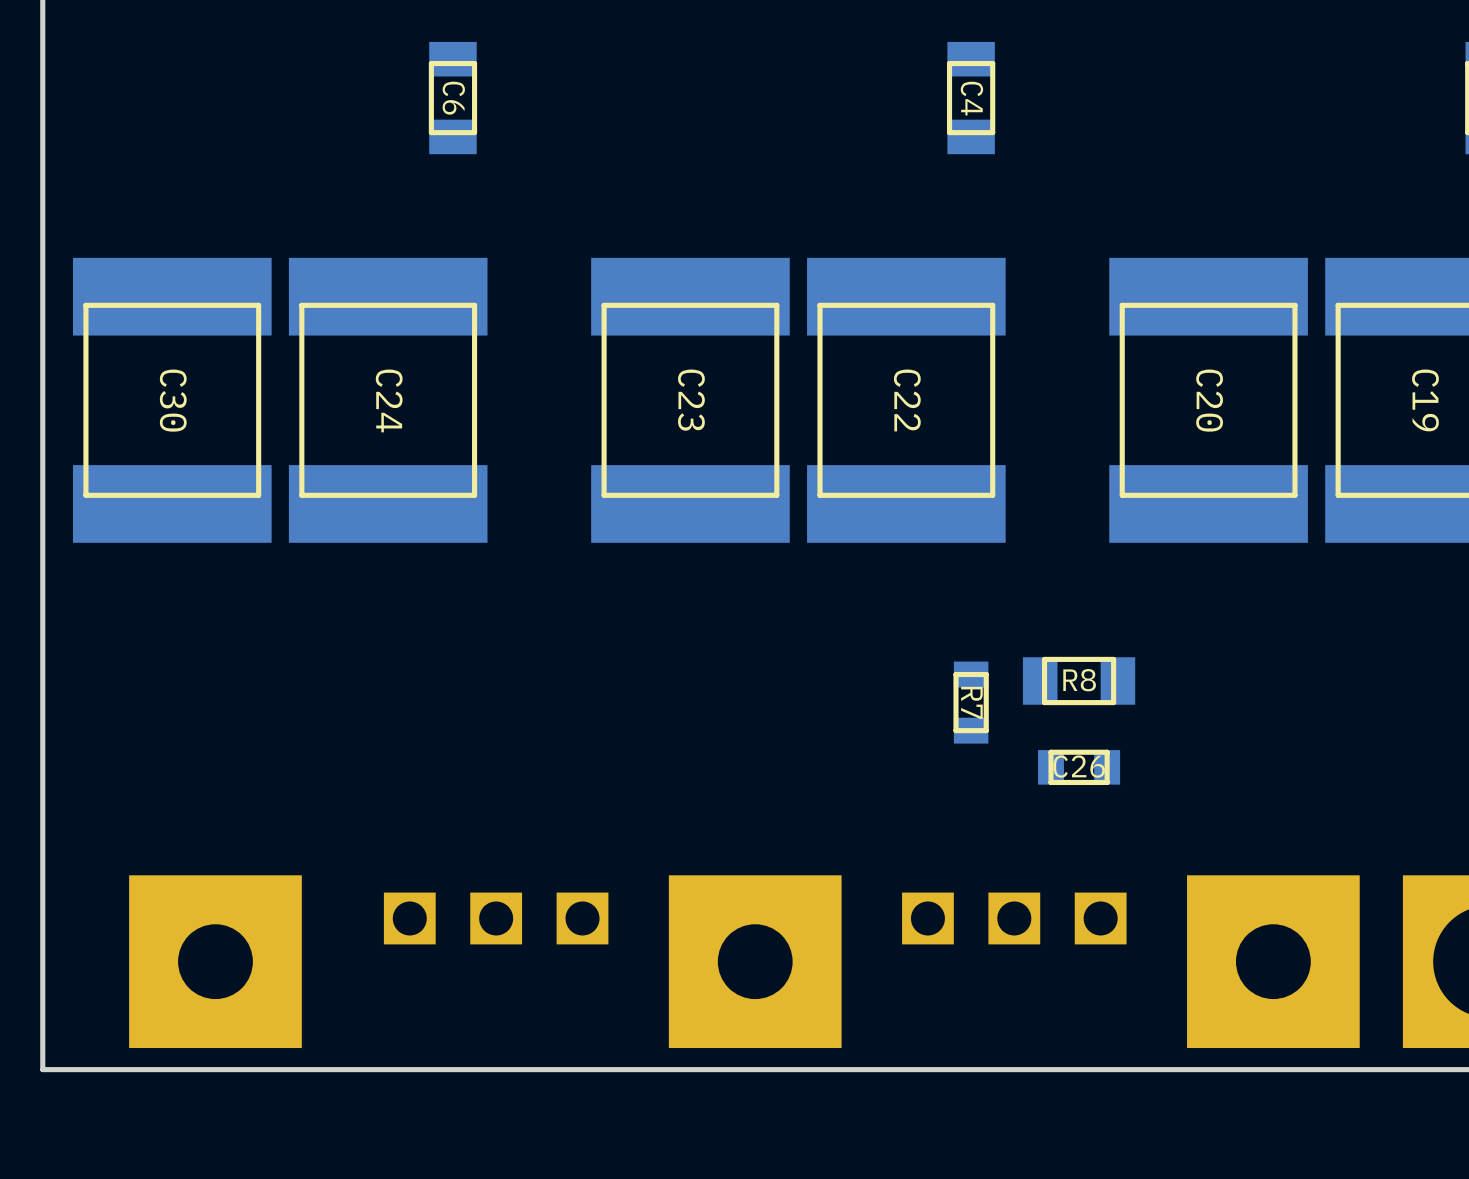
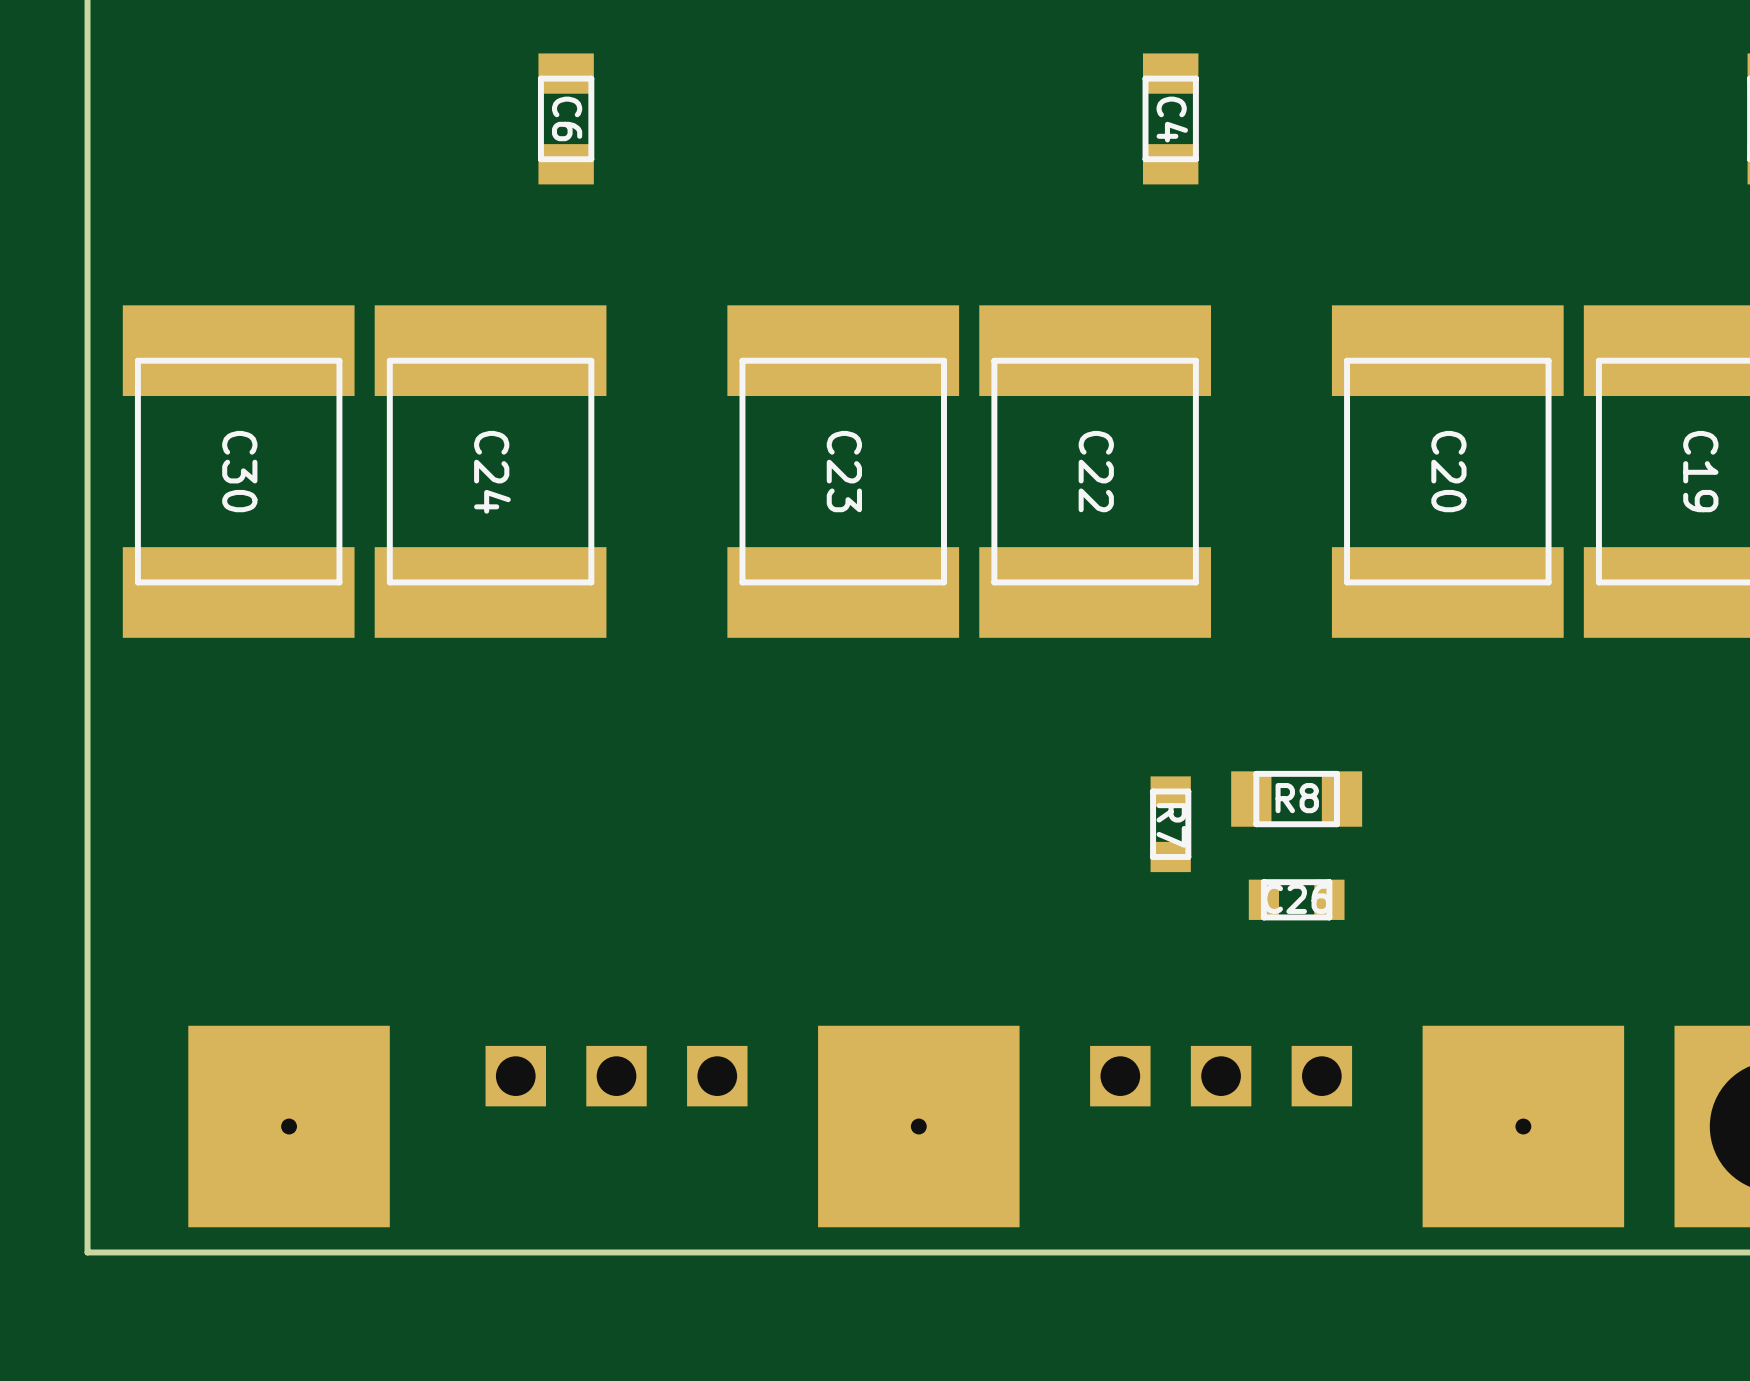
part footprint: [129, 875, 302, 1049] -> [188, 1025, 390, 1228]
part footprint: [668, 875, 842, 1049] -> [818, 1025, 1020, 1228]
part footprint: [1187, 875, 1360, 1049] -> [1422, 1025, 1625, 1228]

